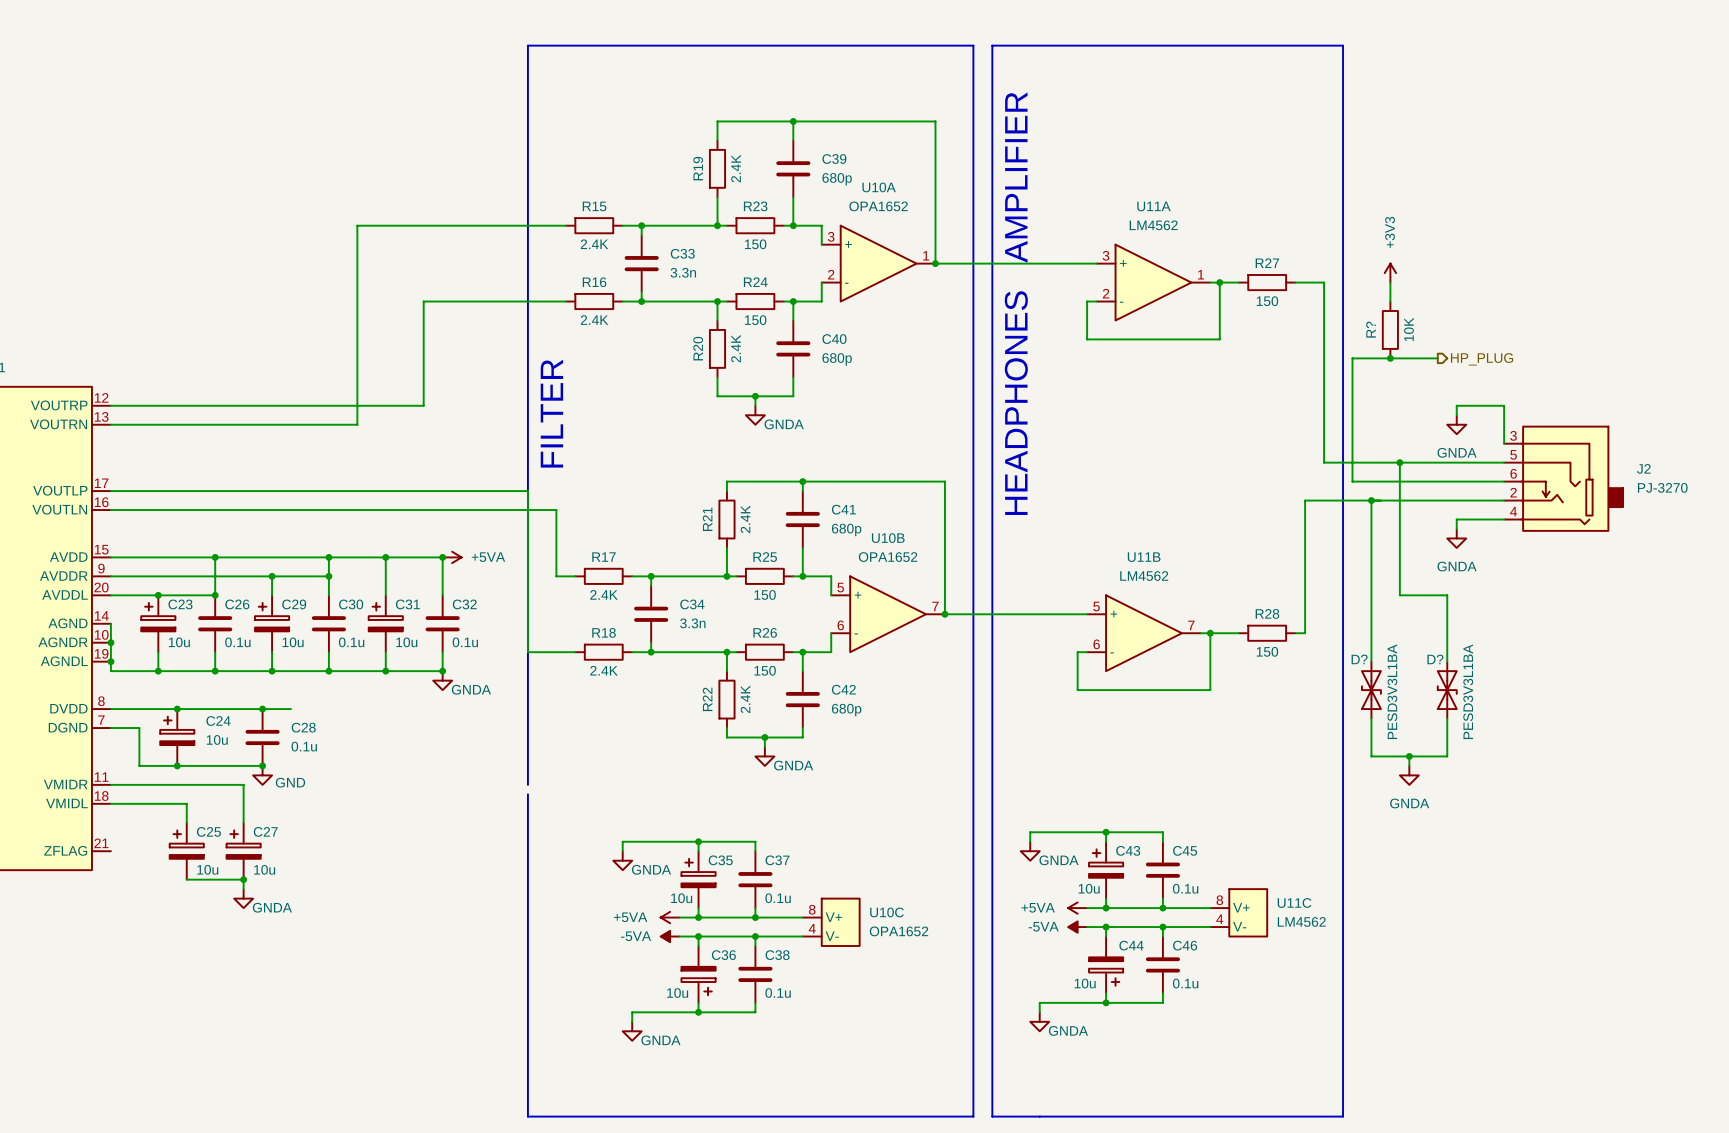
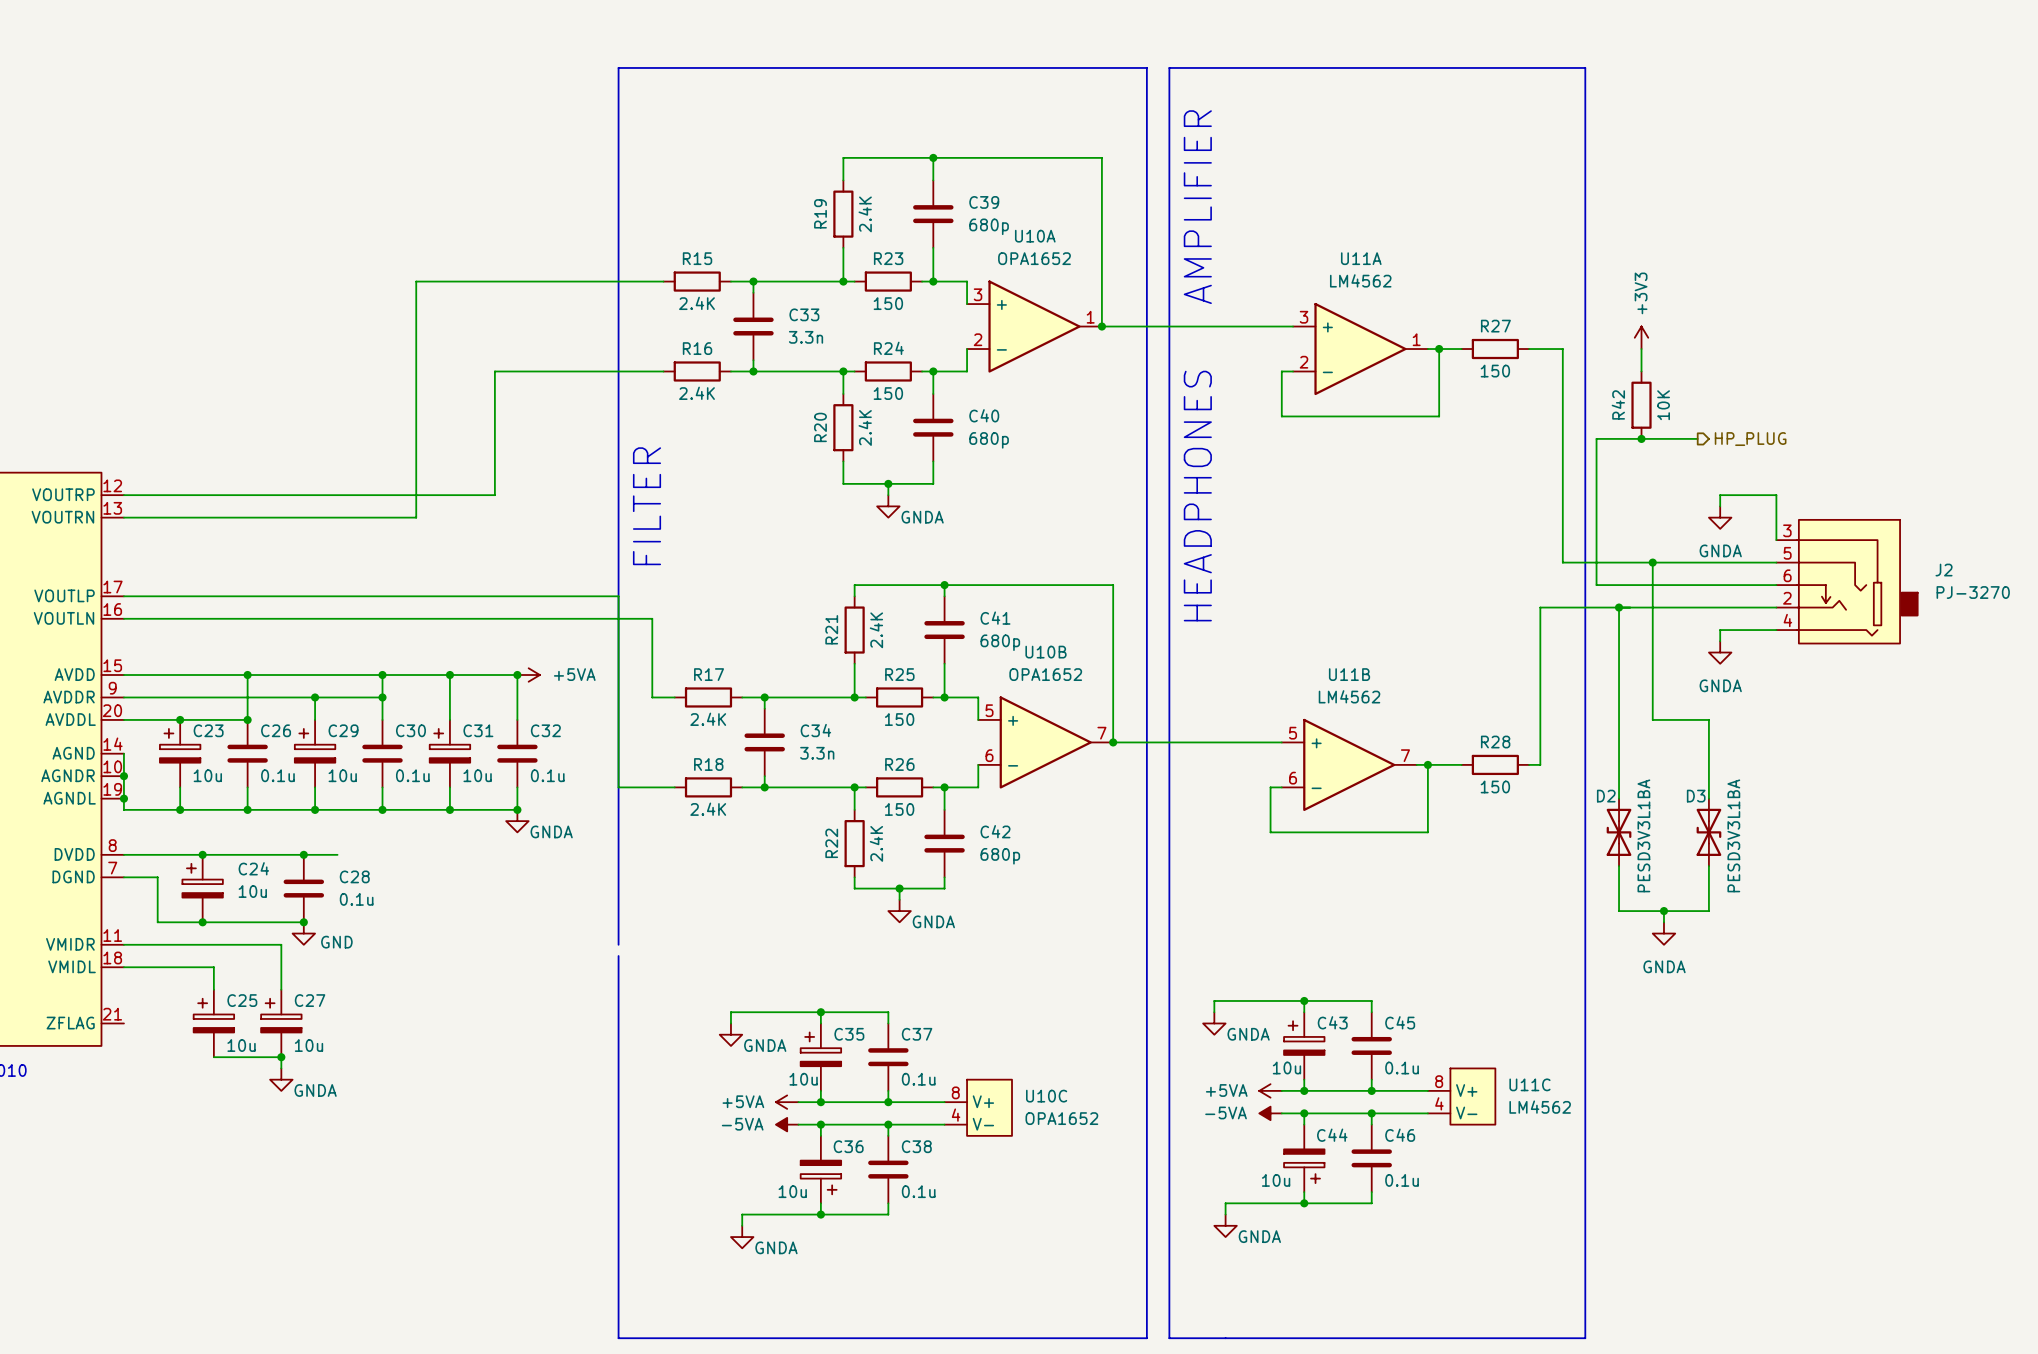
R? name: R? (1371, 329) -> R42 (1618, 404)
D? name: D? (1359, 659) -> D2 (1606, 796)
D? name: D? (1435, 659) -> D3 (1696, 796)

